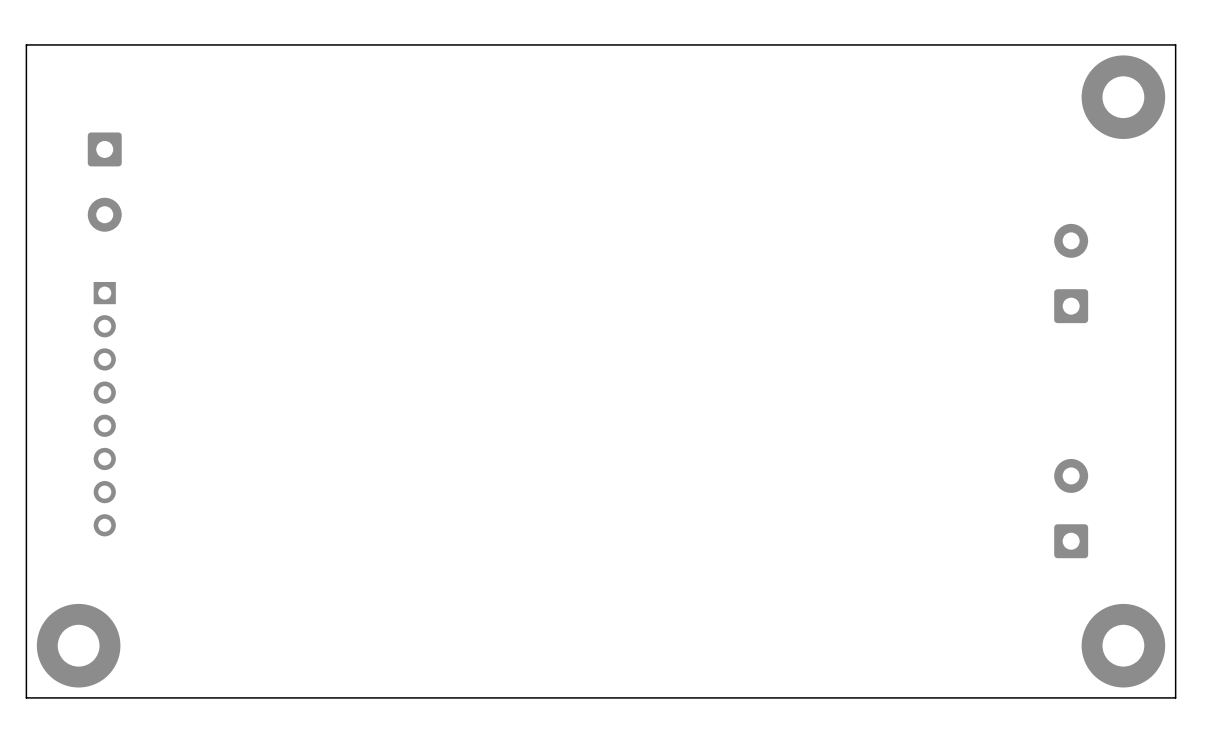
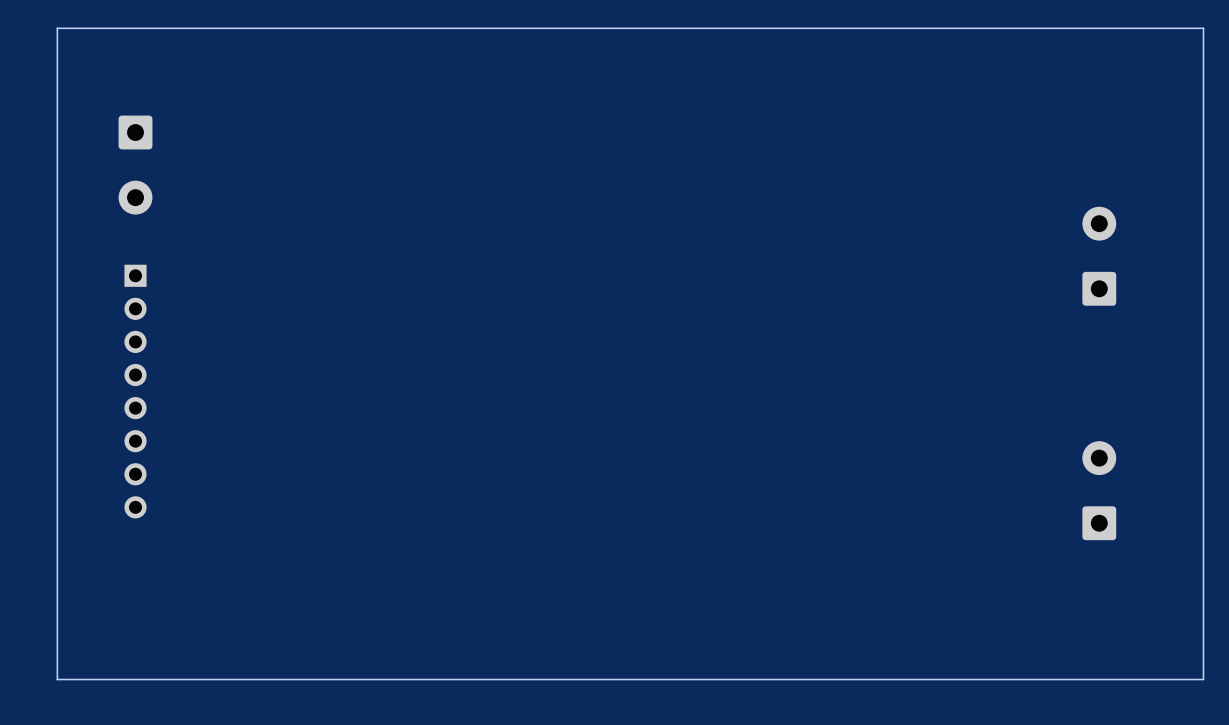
part: (1123, 97) -> none
part: (78, 645) -> none
part: (1123, 645) -> none

